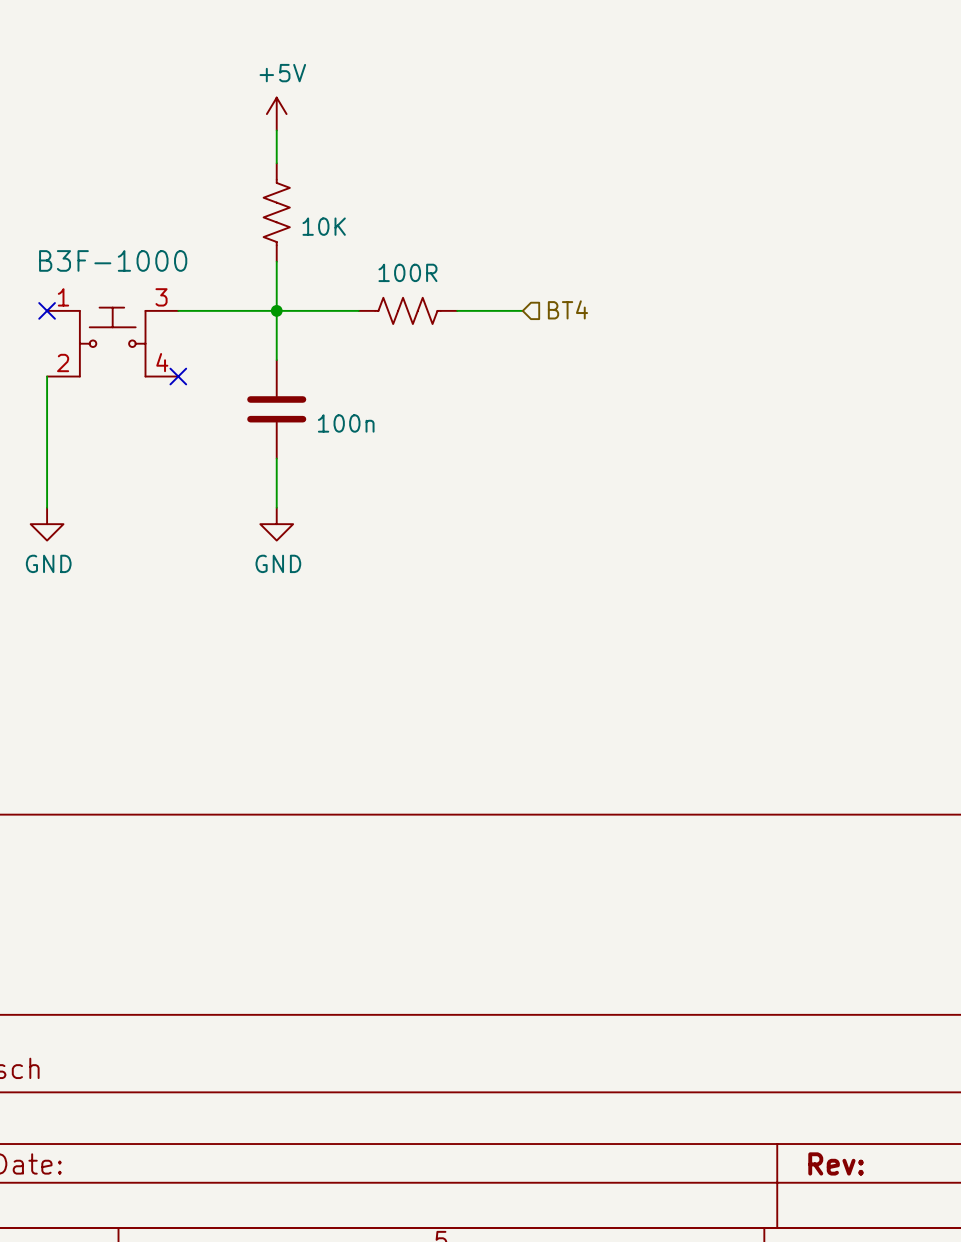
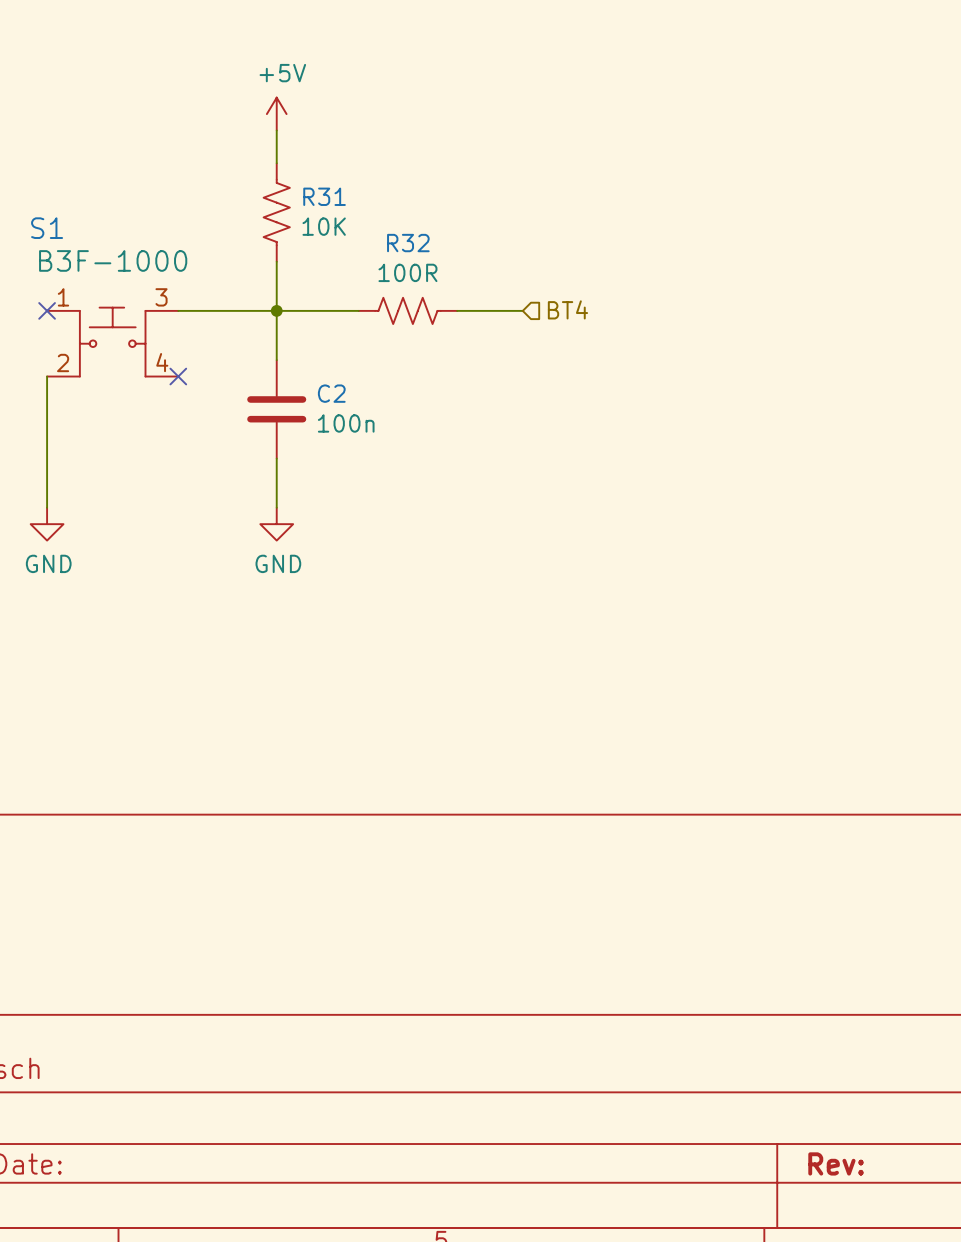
R31 name: none -> R31 (324, 196)
S1 name: none -> S1 (47, 228)
R32 name: none -> R32 (408, 243)
C2 name: none -> C2 (331, 393)

